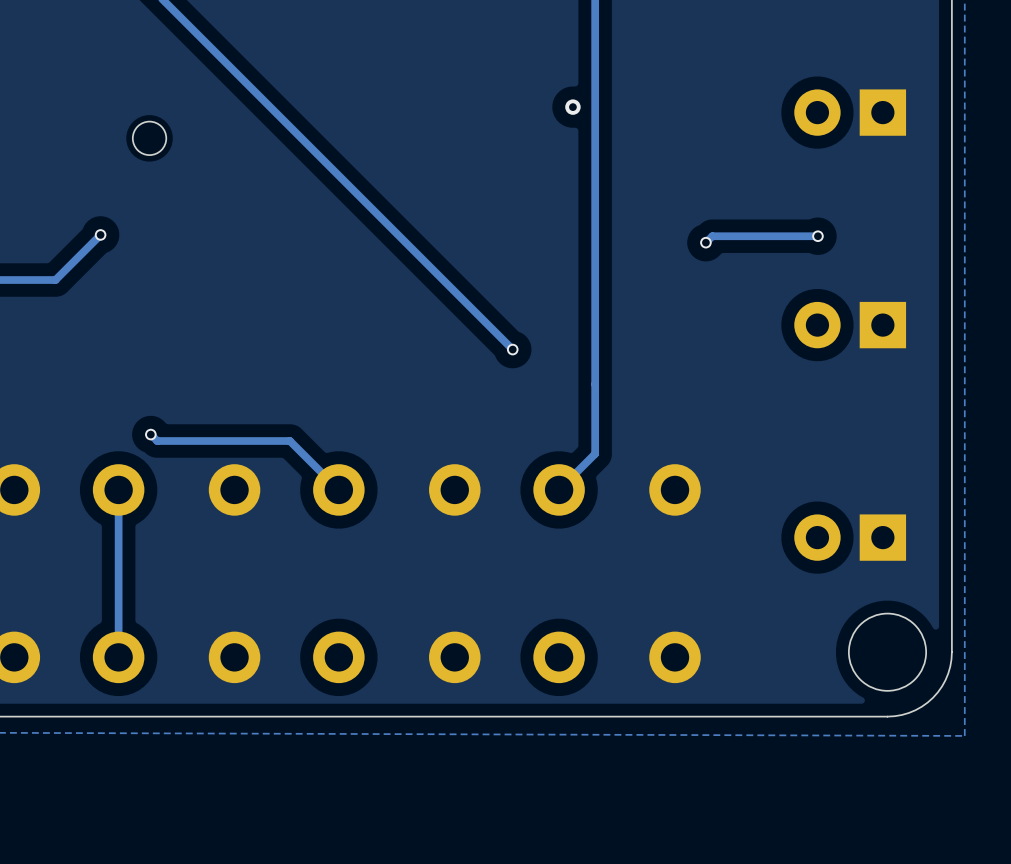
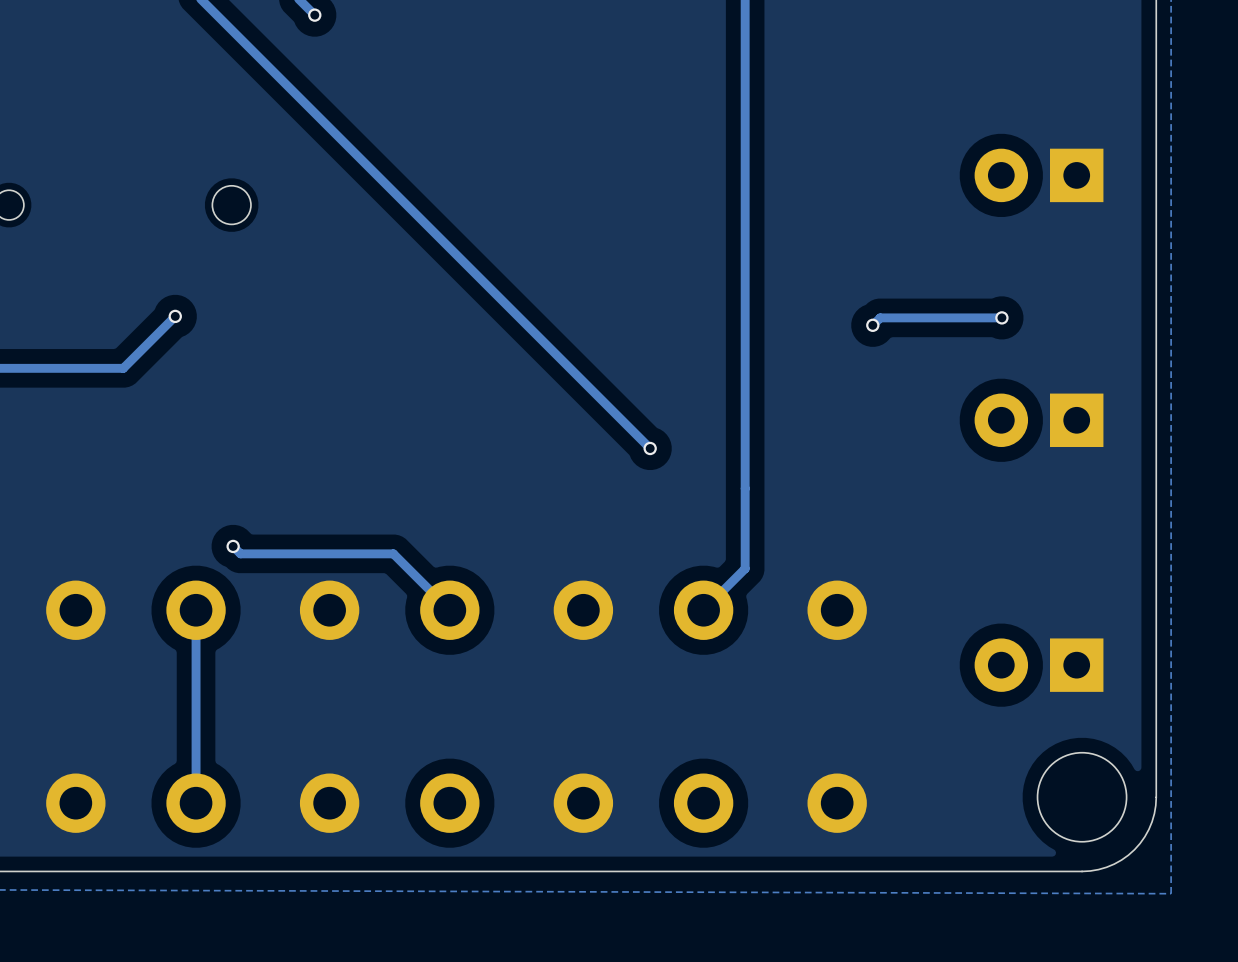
via: (572, 107) -> none

